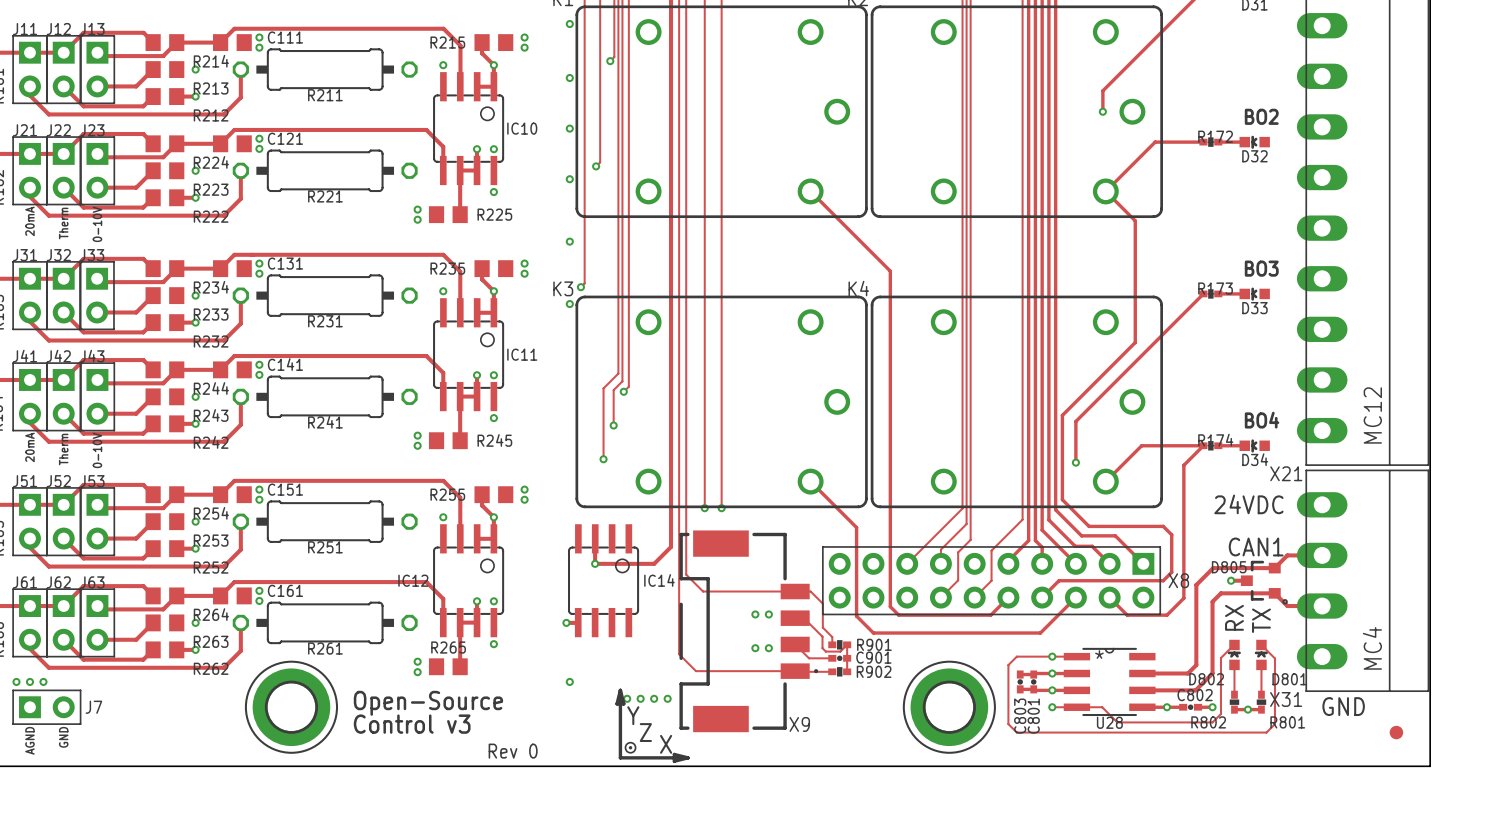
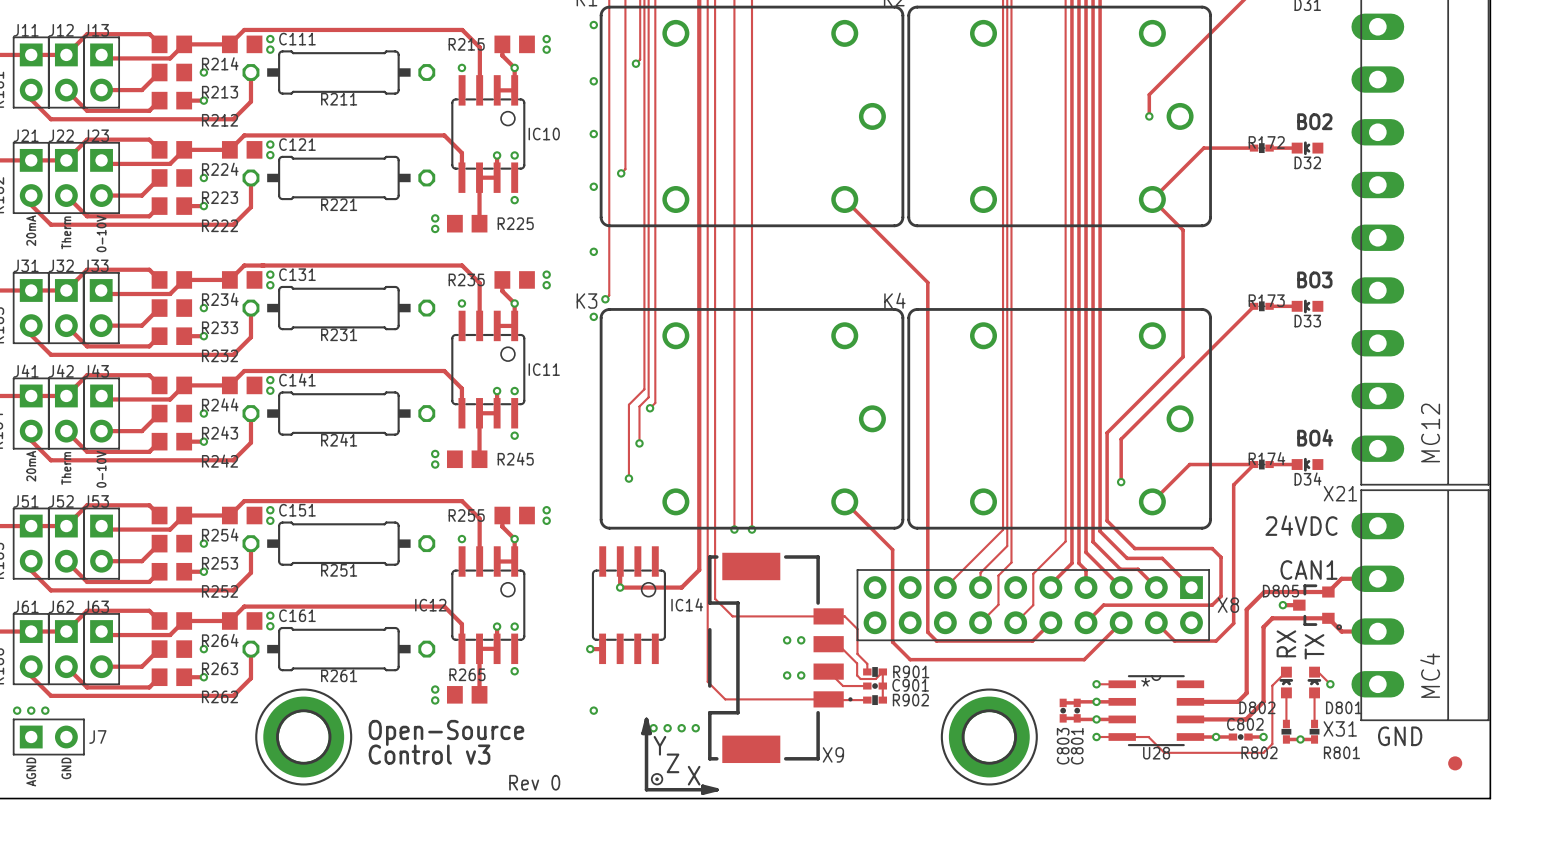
track: (1261, 645) (1274, 658) (1274, 724) (1266, 732) (1016, 732) (1008, 724) (1008, 665) (1016, 656) (1052, 656) -> (1314, 672) (1318, 672) (1330, 684)
via: none -> (1330, 684)

